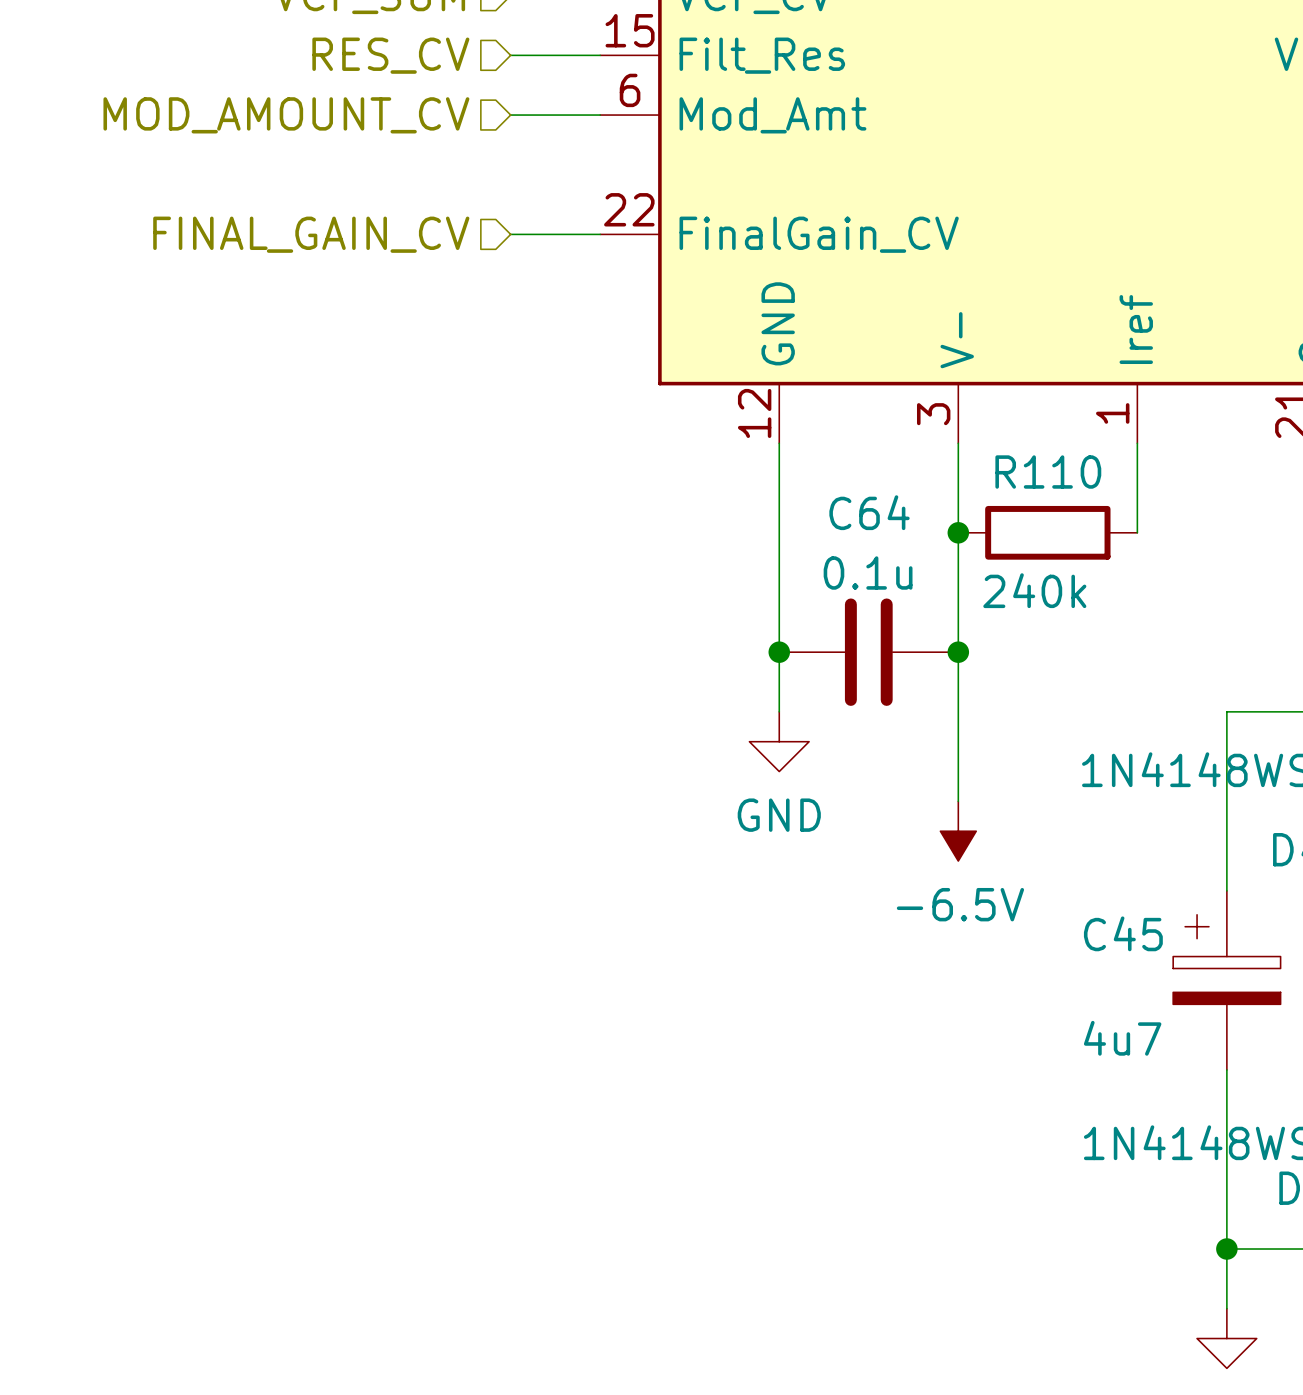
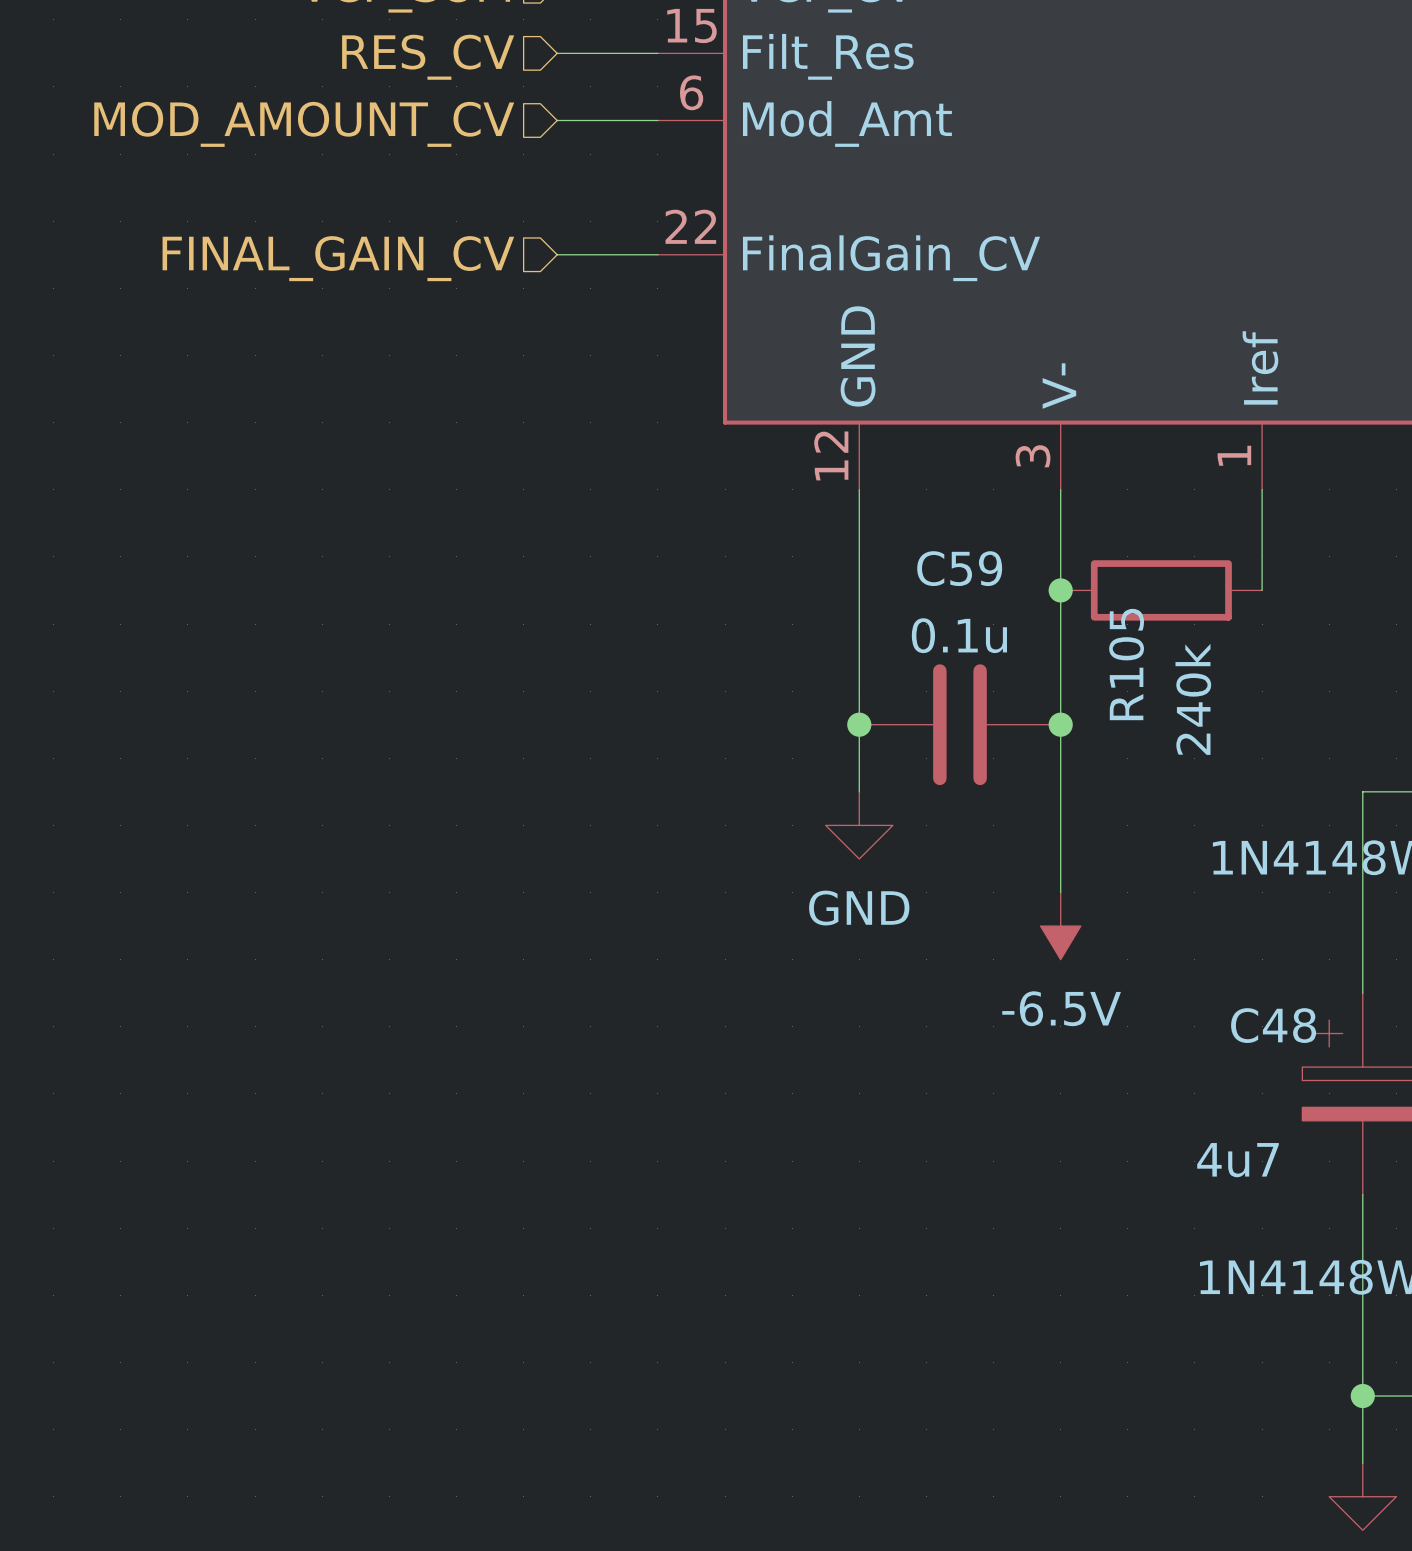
R110 name: R110 (1048, 472) -> R105 (1126, 664)
C64 name: C64 (869, 512) -> C59 (959, 568)
R110 value rotation: 0° (1034, 590) -> 90° counterclockwise (1193, 699)
C45 name: C45 (1123, 933) -> C48 (1273, 1025)

